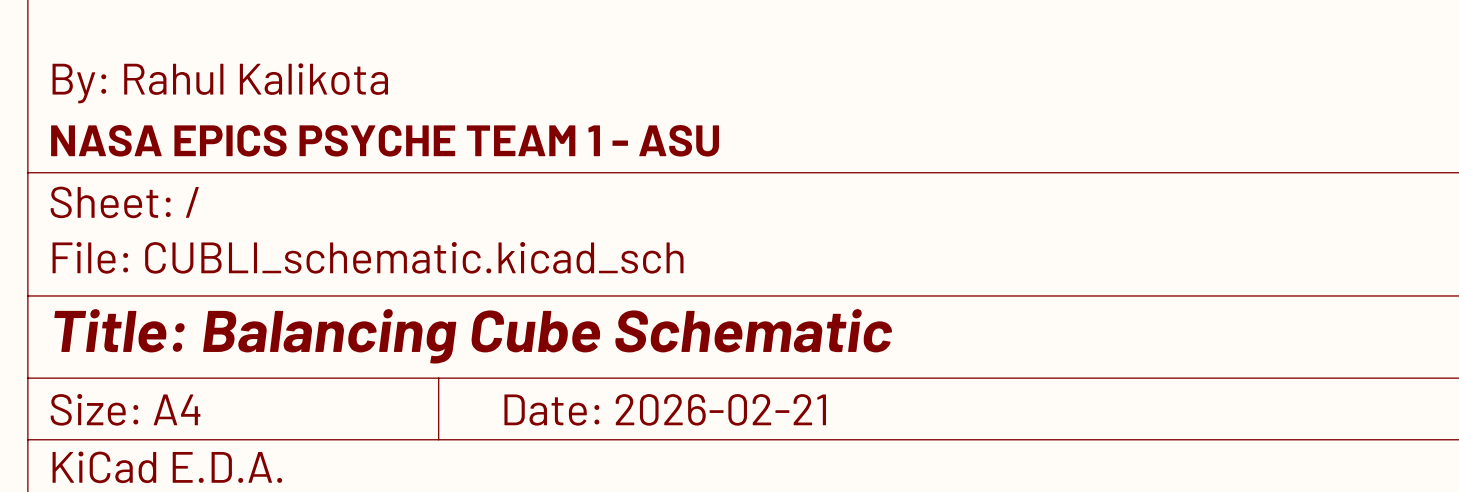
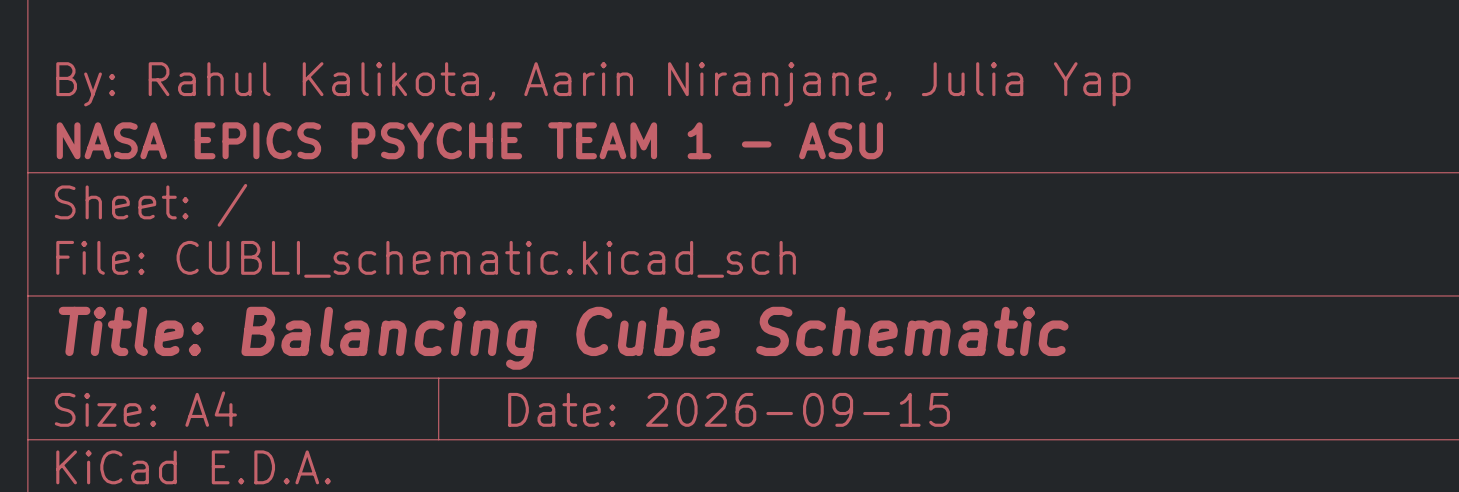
title block: By: Rahul Kalikota (220, 83) -> By: Rahul Kalikota, Aarin Niranjane, Julia Yap (593, 84)
title block: Date: 2026-02-21 (665, 409) -> Date: 2026-09-15 (729, 409)

